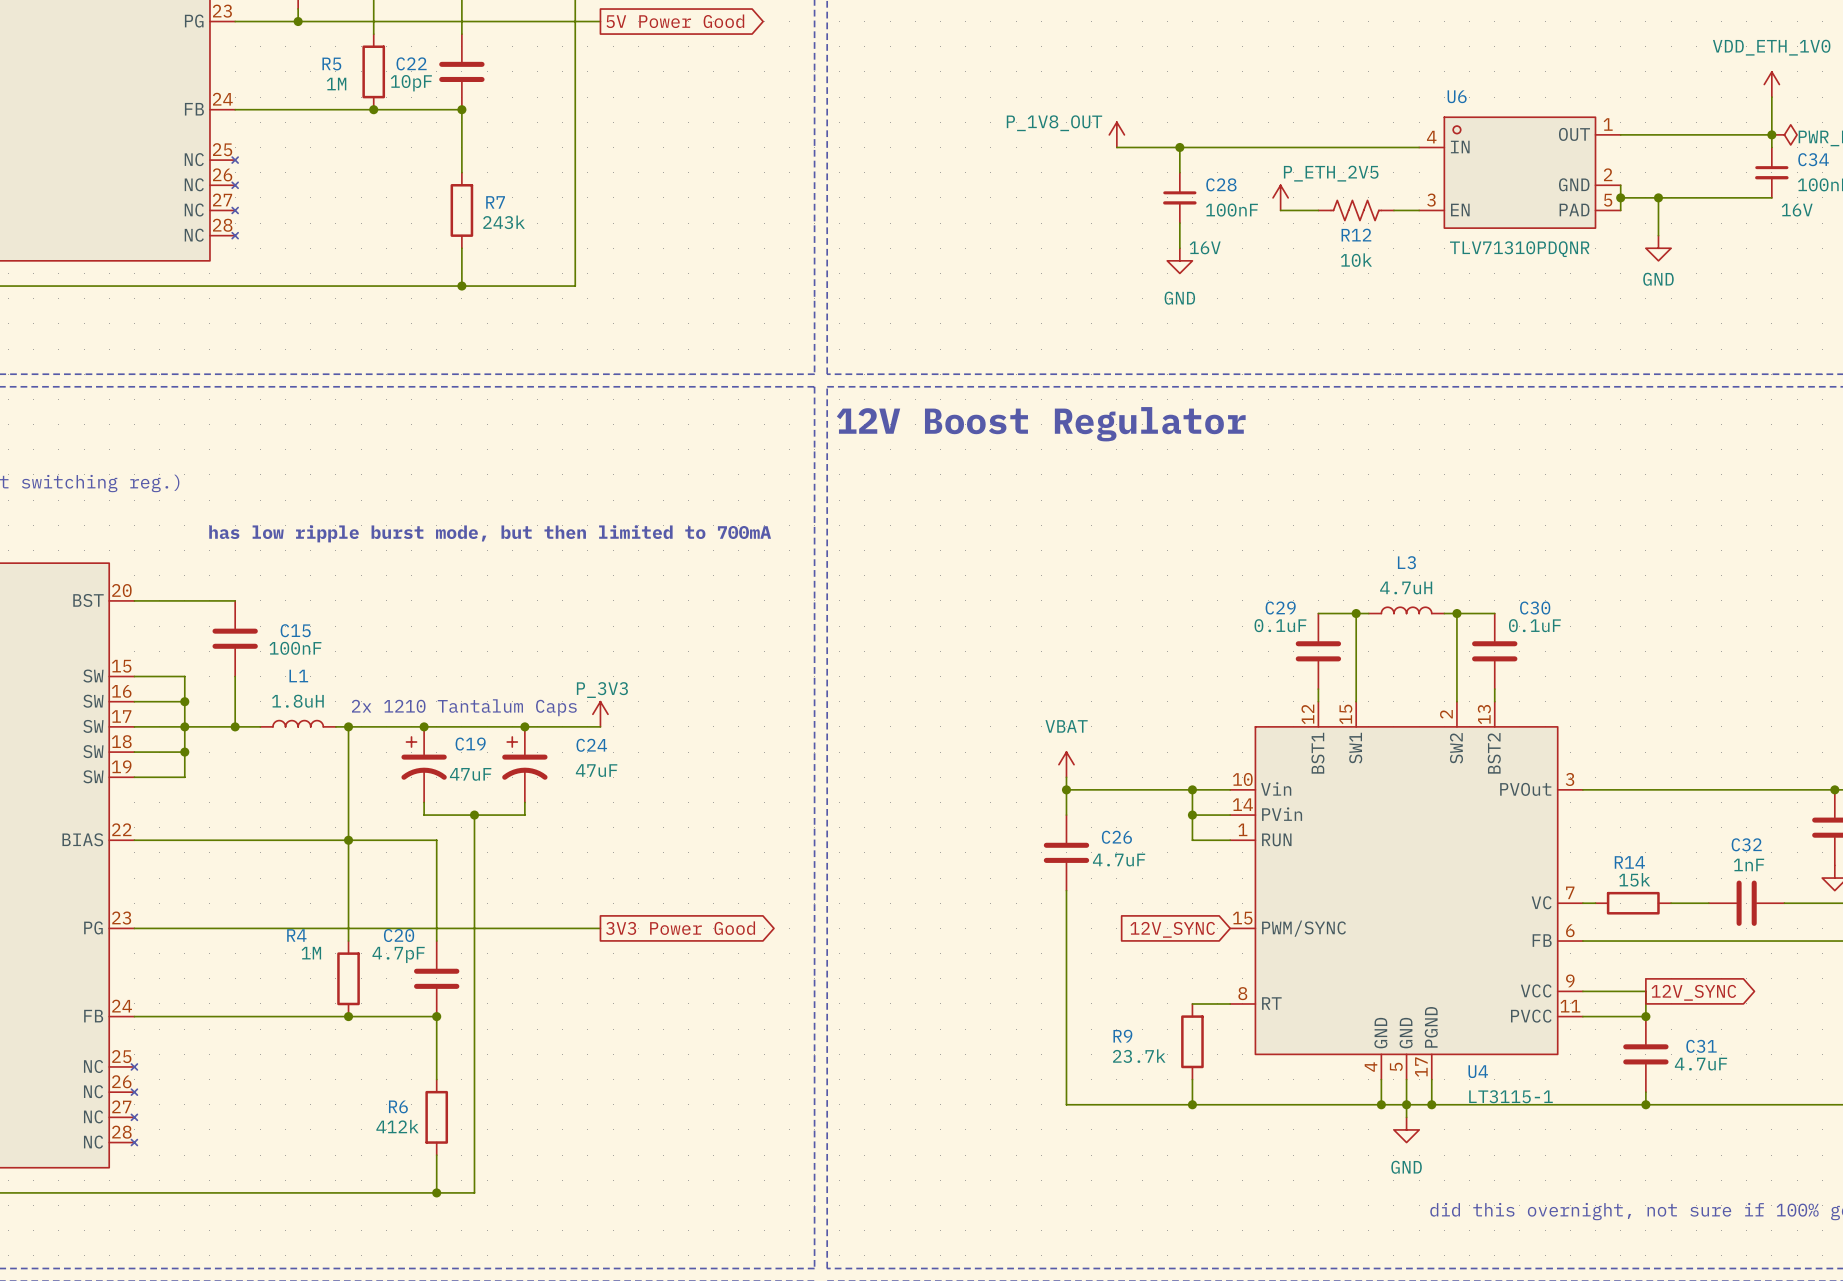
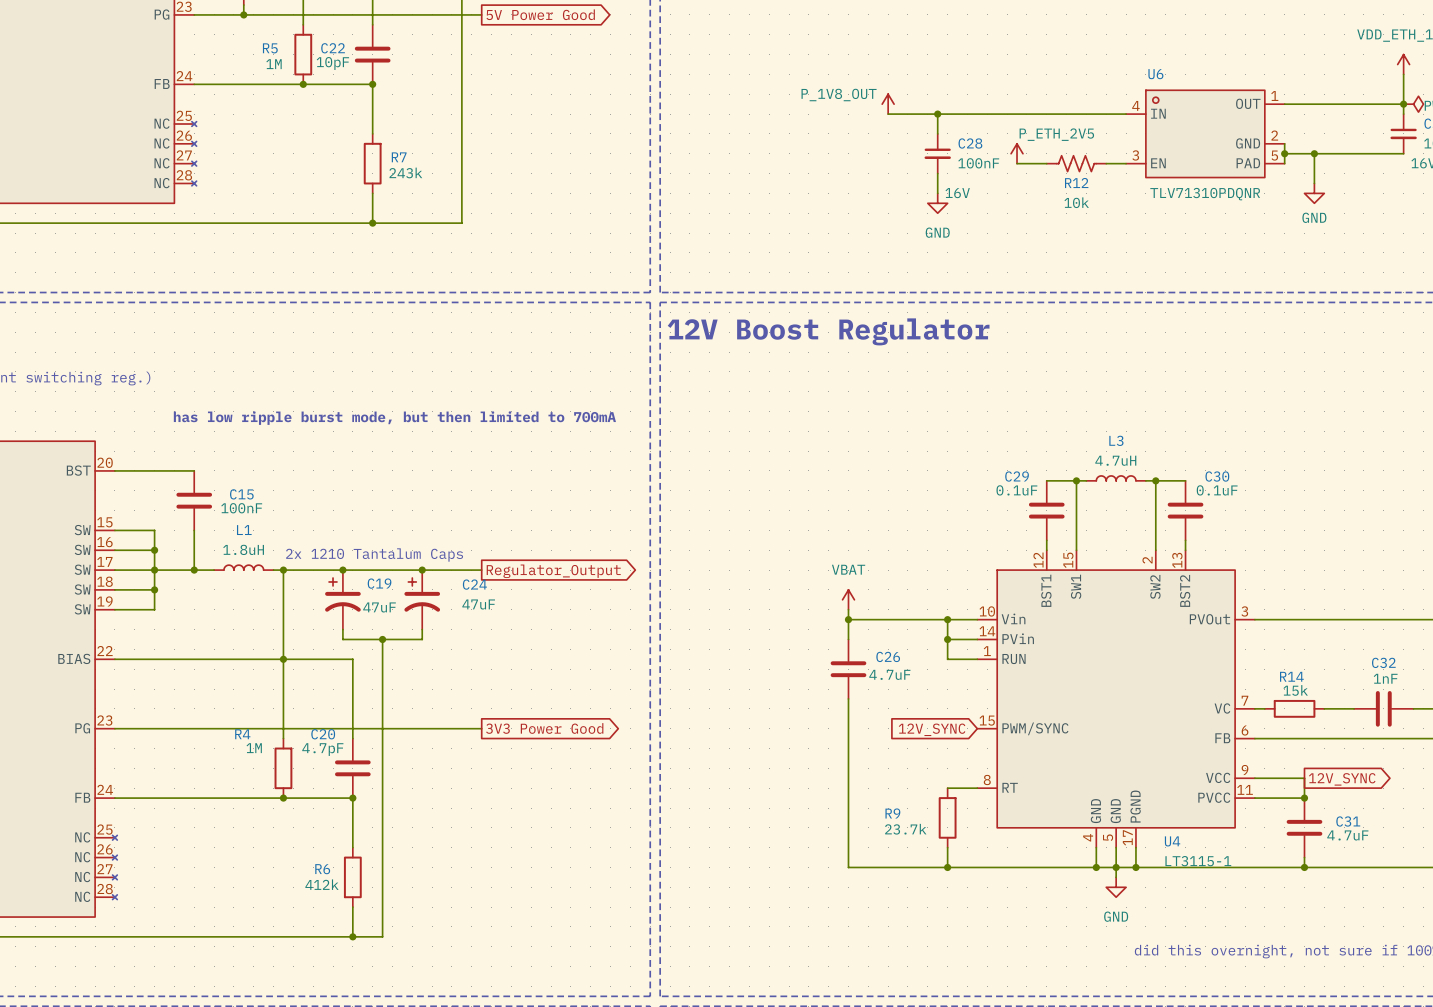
power symbol: P_3V3 (600, 714) -> none
global label: none -> Regulator_Output (553, 571)

